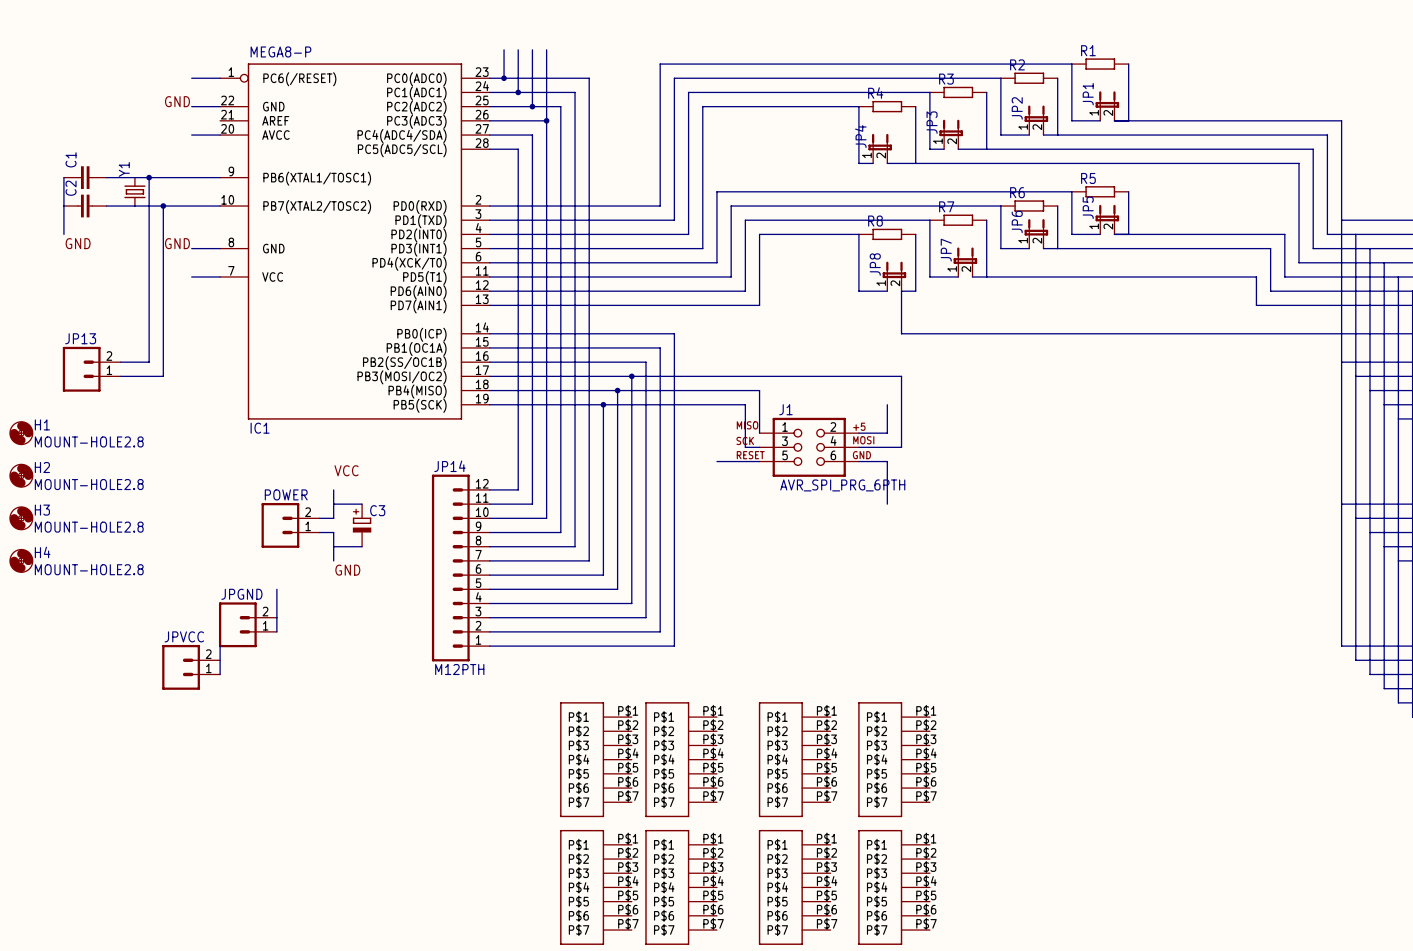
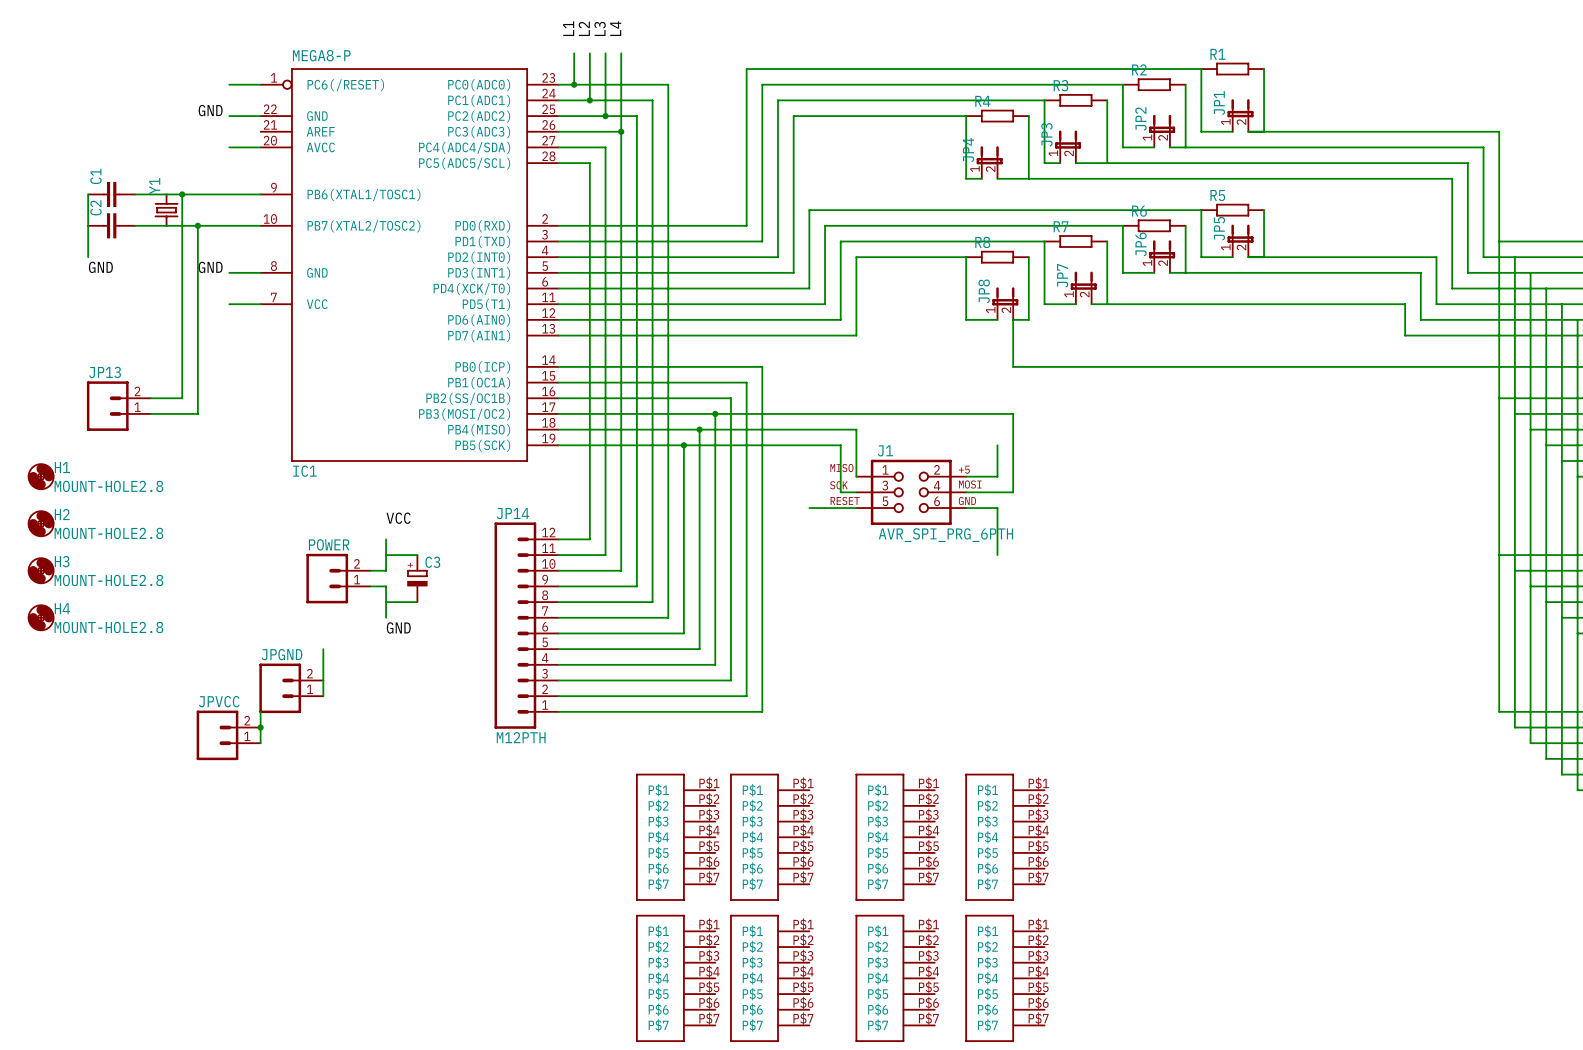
label: none -> L4 (615, 28)
label: none -> L1 (568, 28)
label: none -> L2 (584, 28)
label: none -> L3 (600, 28)
junction: none -> (260, 727)

